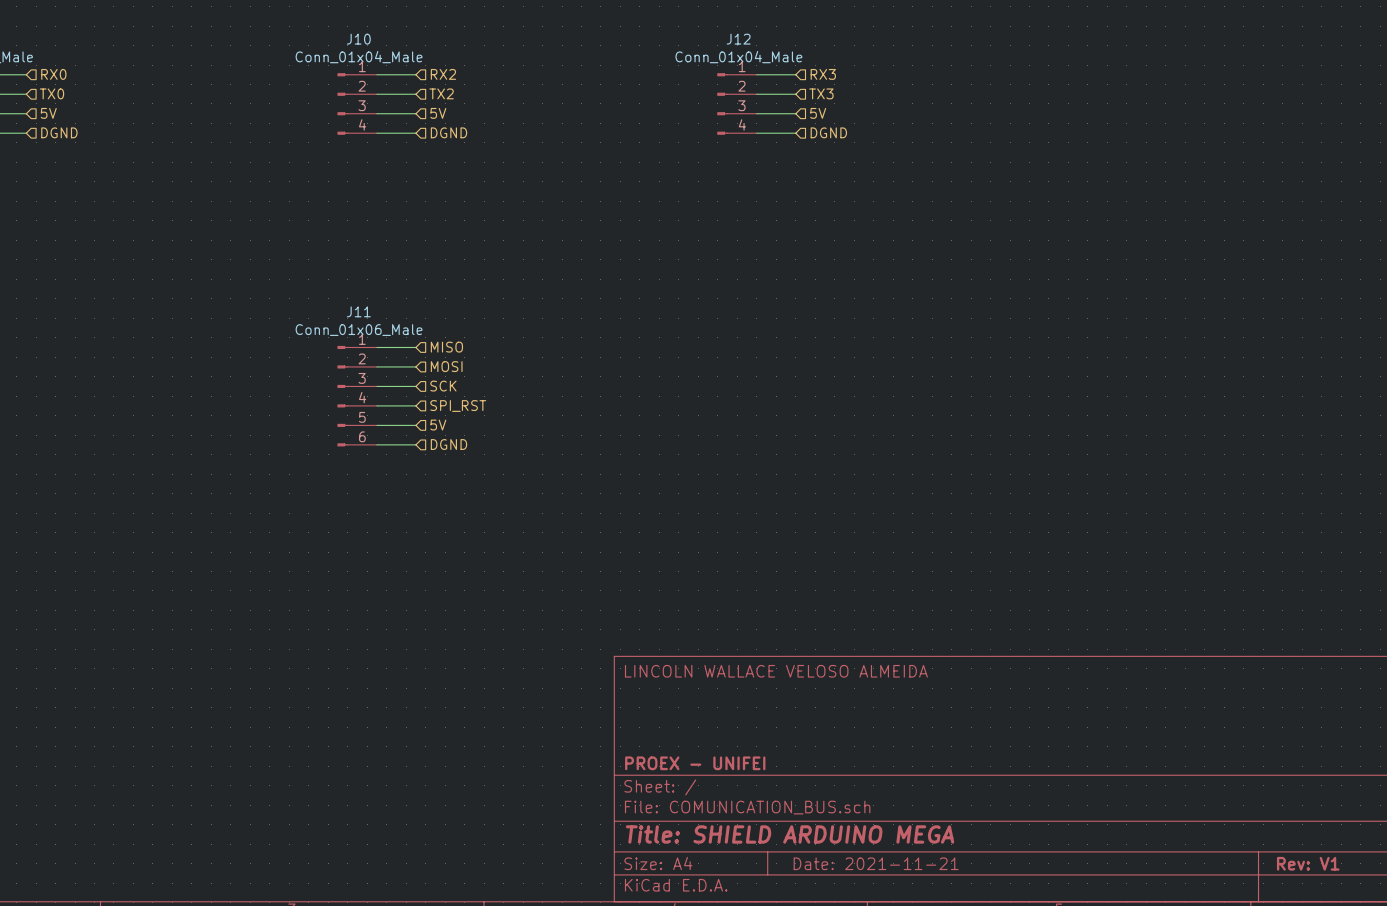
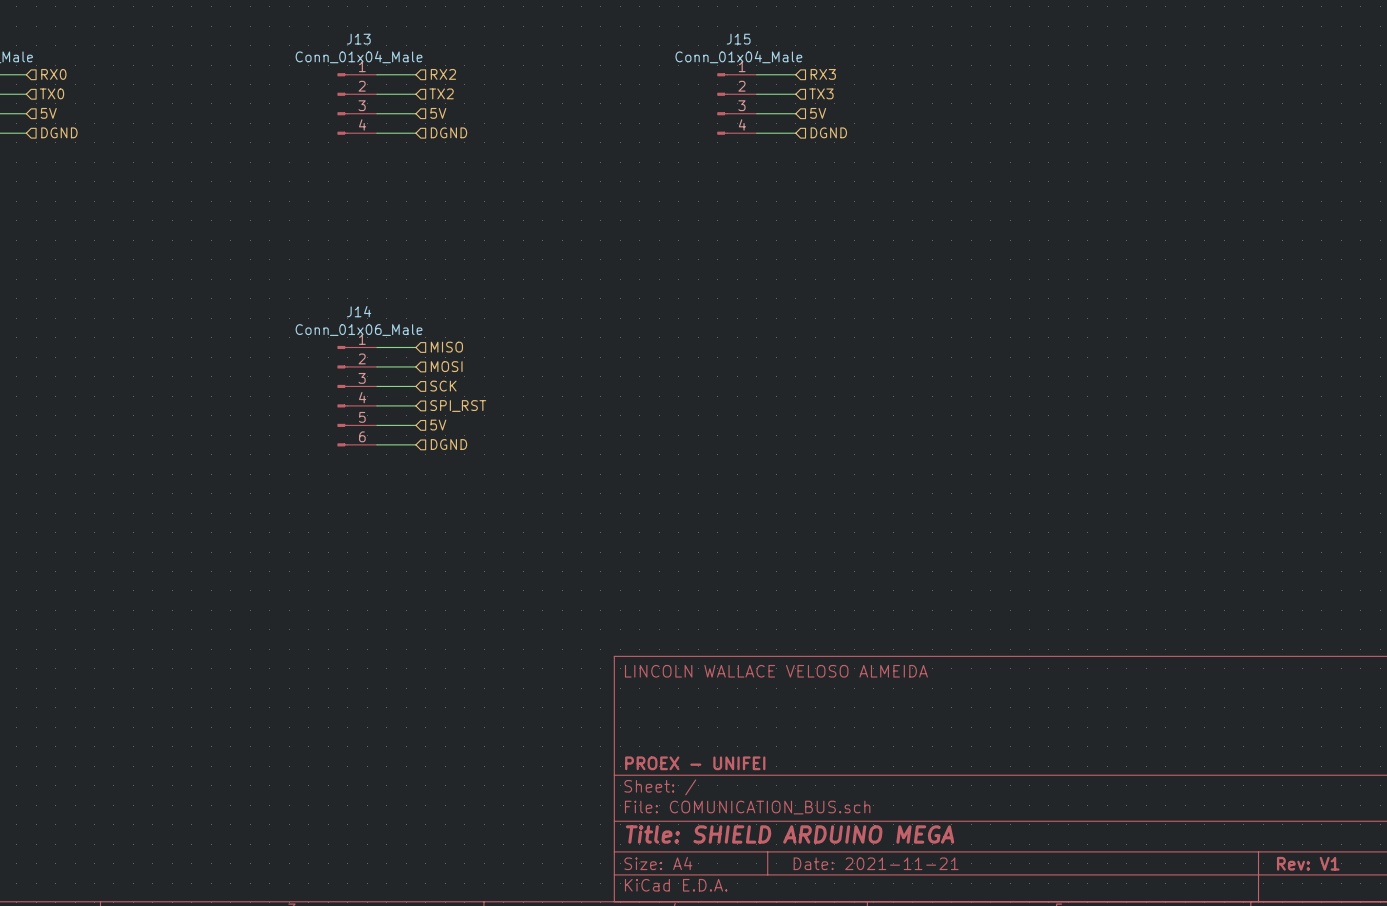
J10 name: J10 (358, 39) -> J13 (358, 39)
J12 name: J12 (738, 39) -> J15 (738, 39)
J11 name: J11 (358, 311) -> J14 (359, 311)

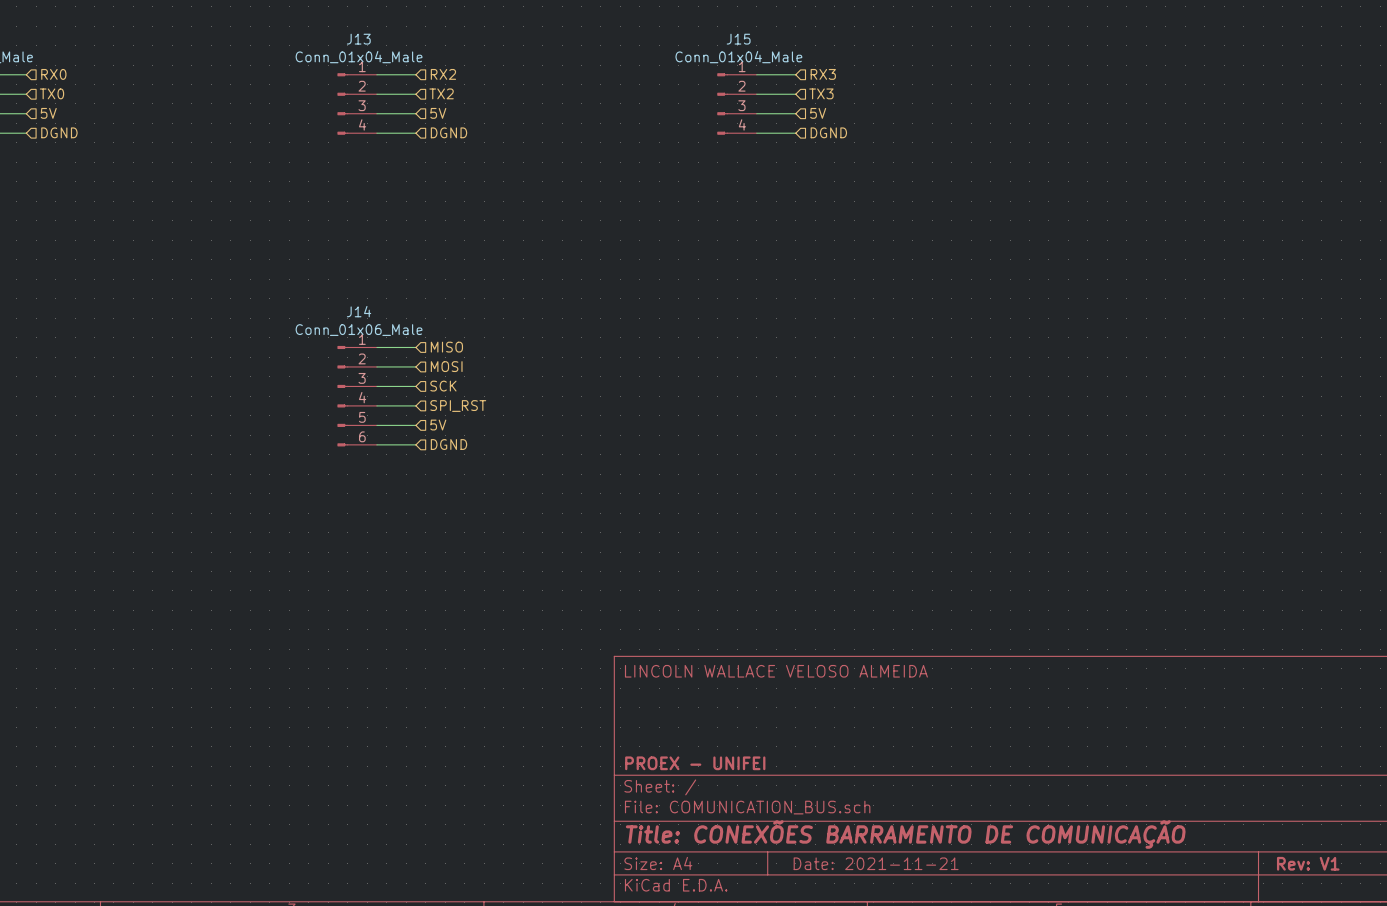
title block: Title: SHIELD ARDUINO MEGA (790, 834) -> Title: CONEXÕES BARRAMENTO DE COMUNICAÇÃO (905, 834)

